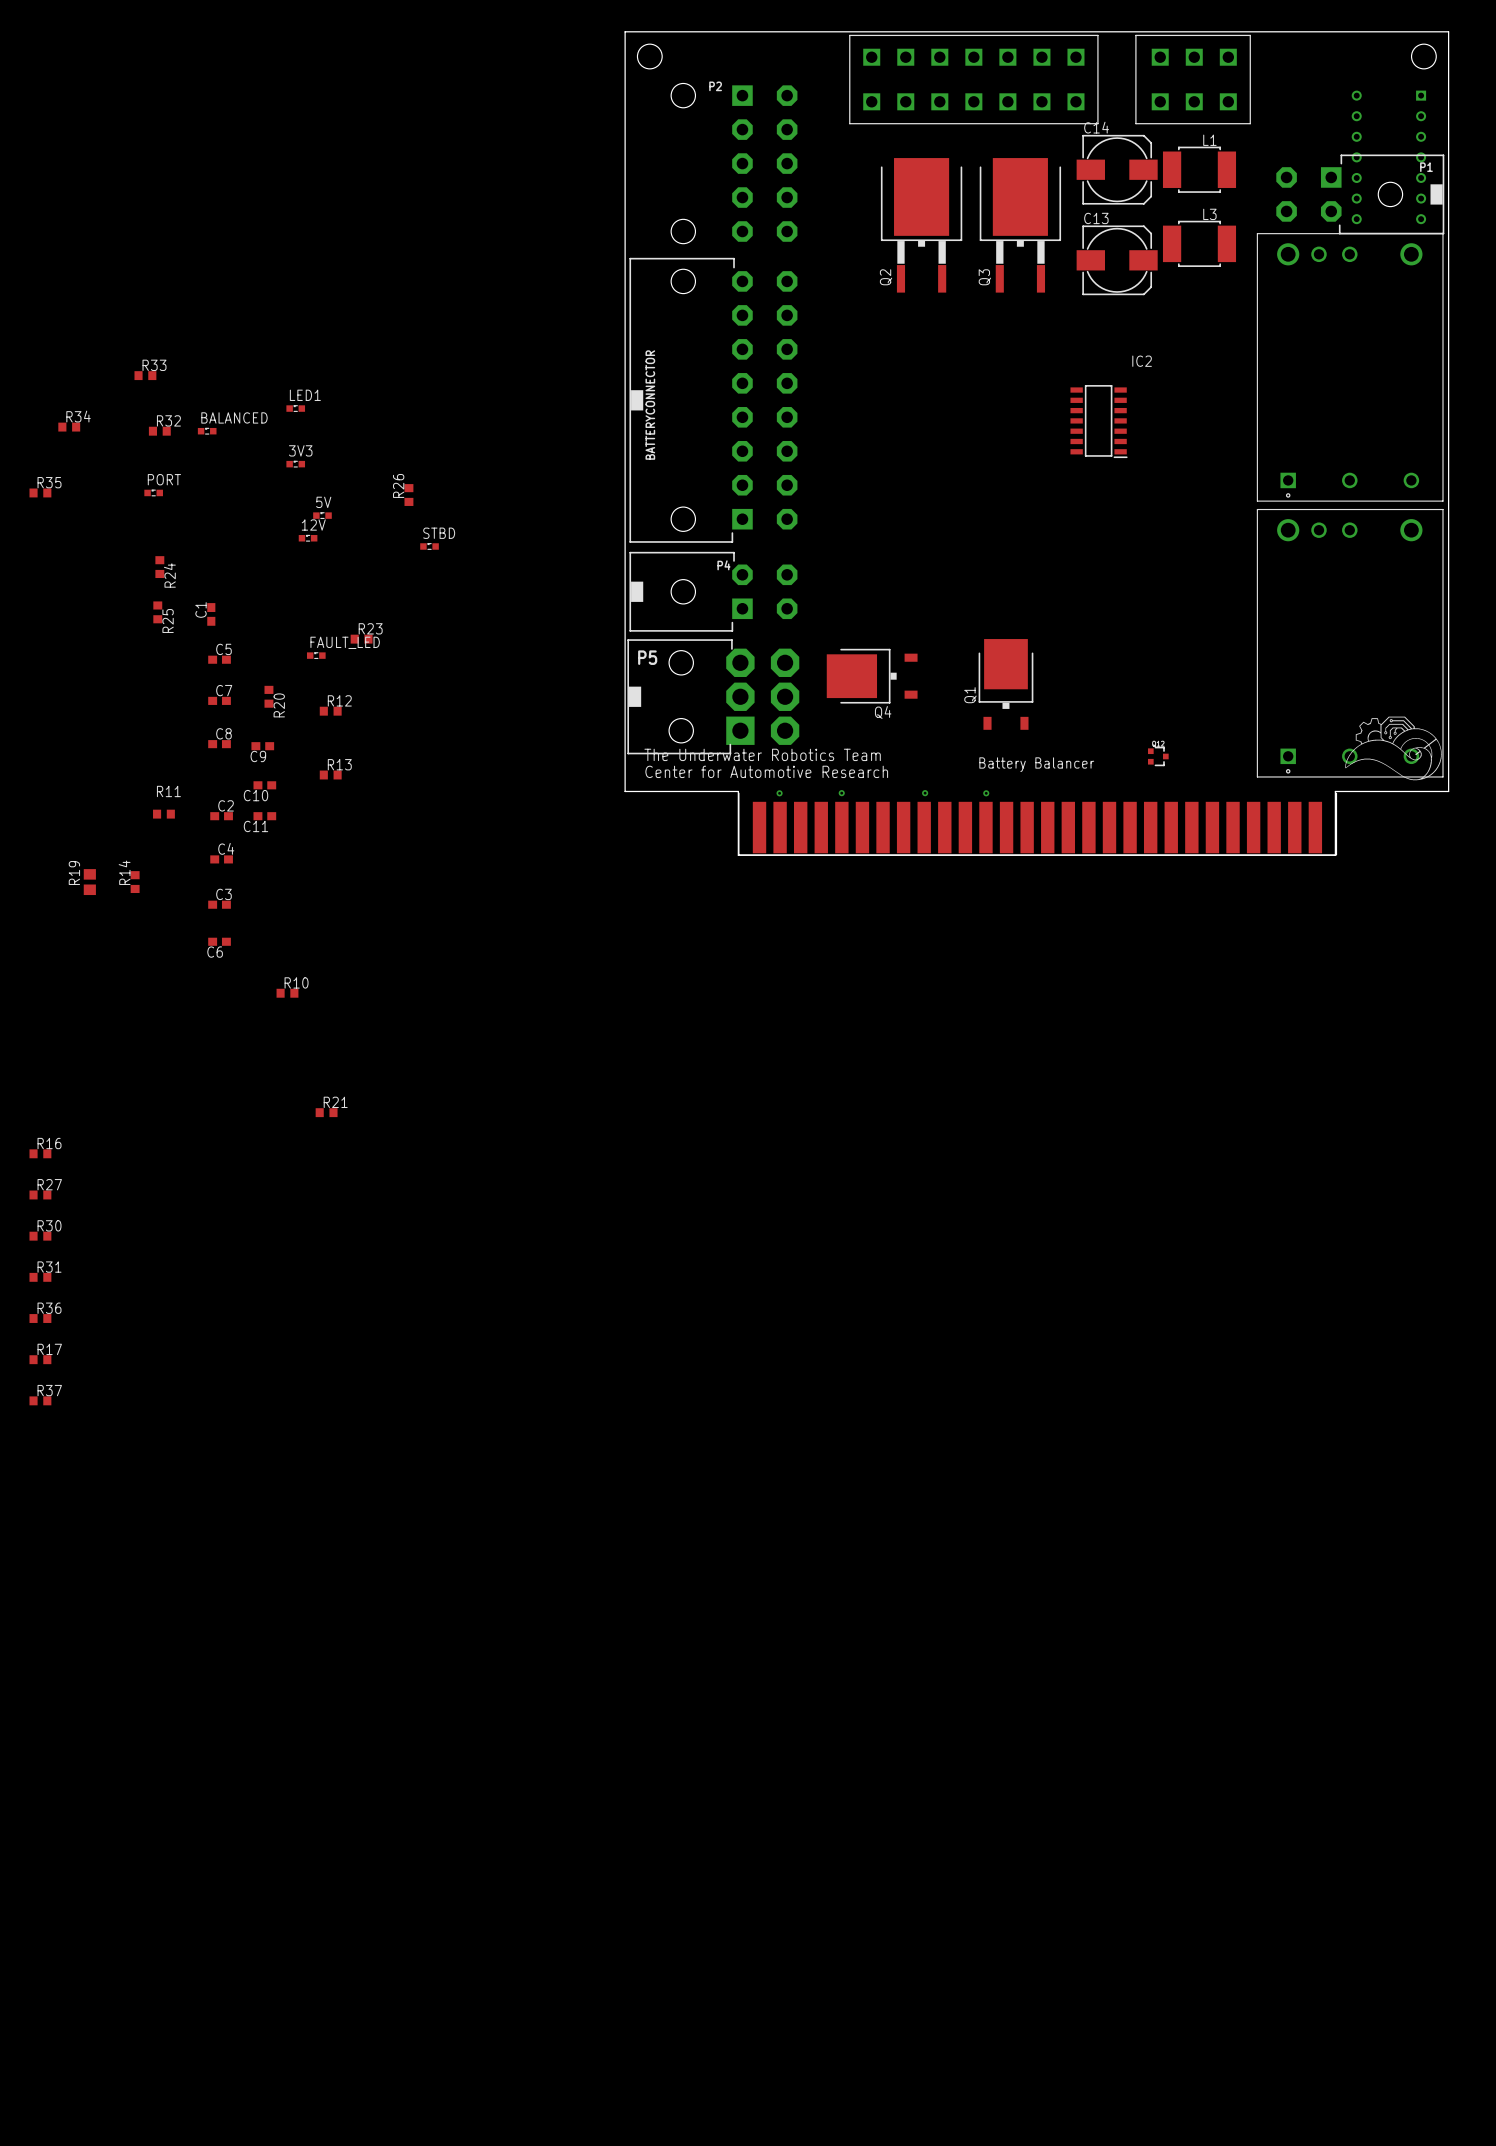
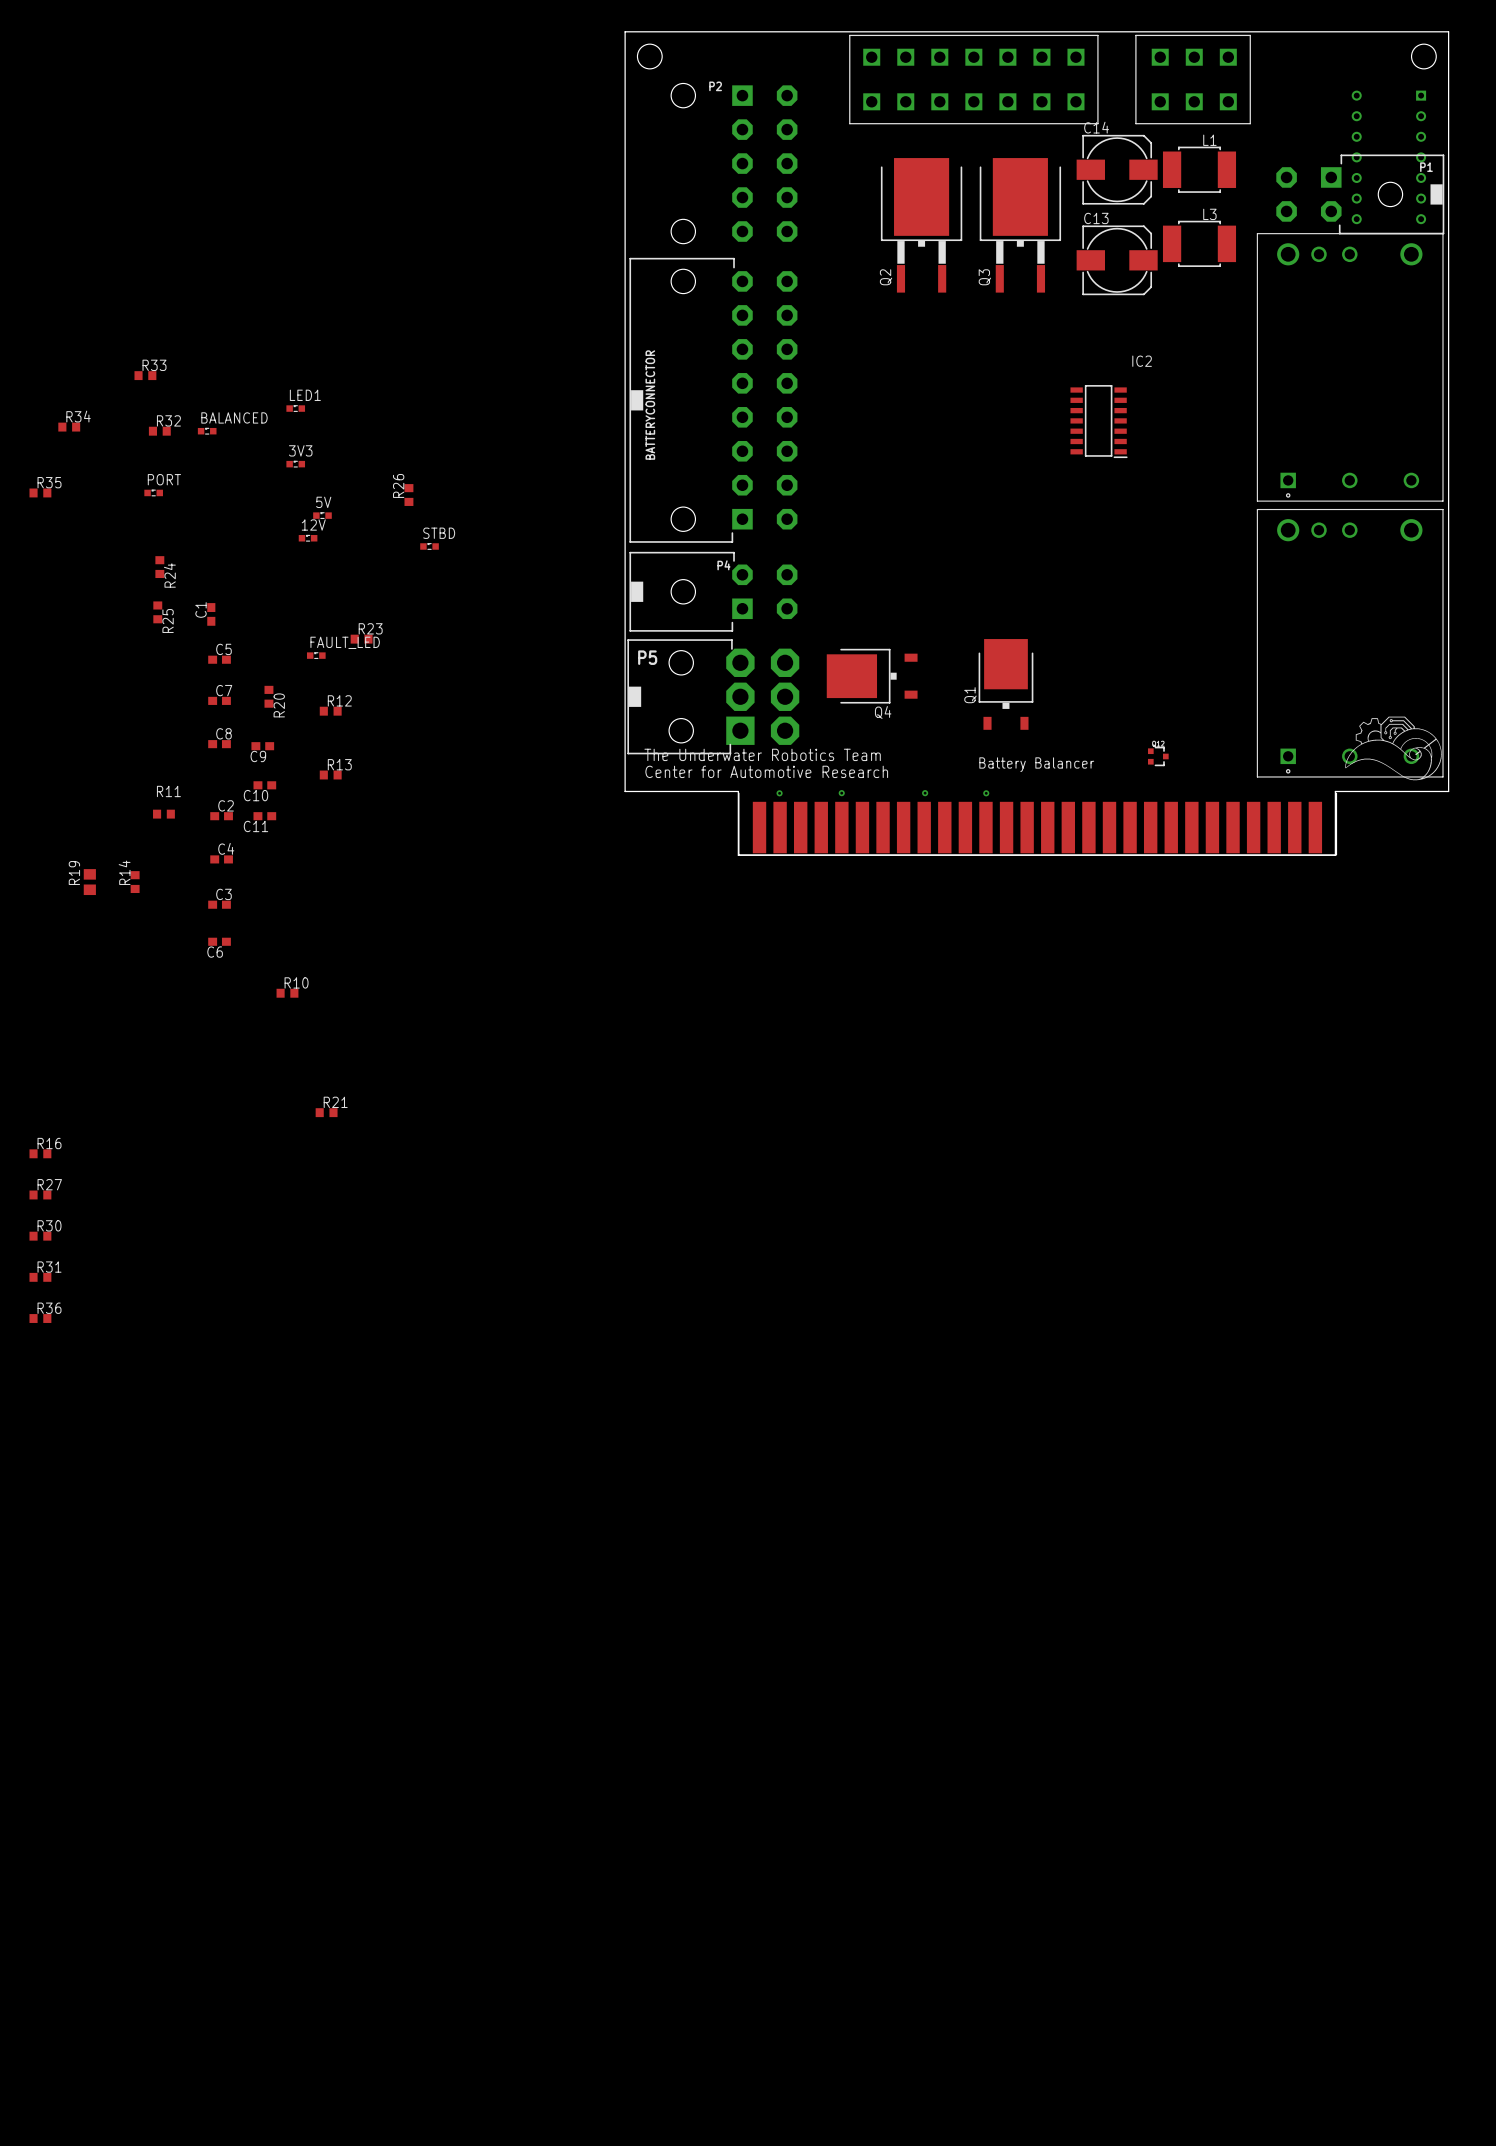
R17: (40, 1359) -> none
R37: (40, 1400) -> none

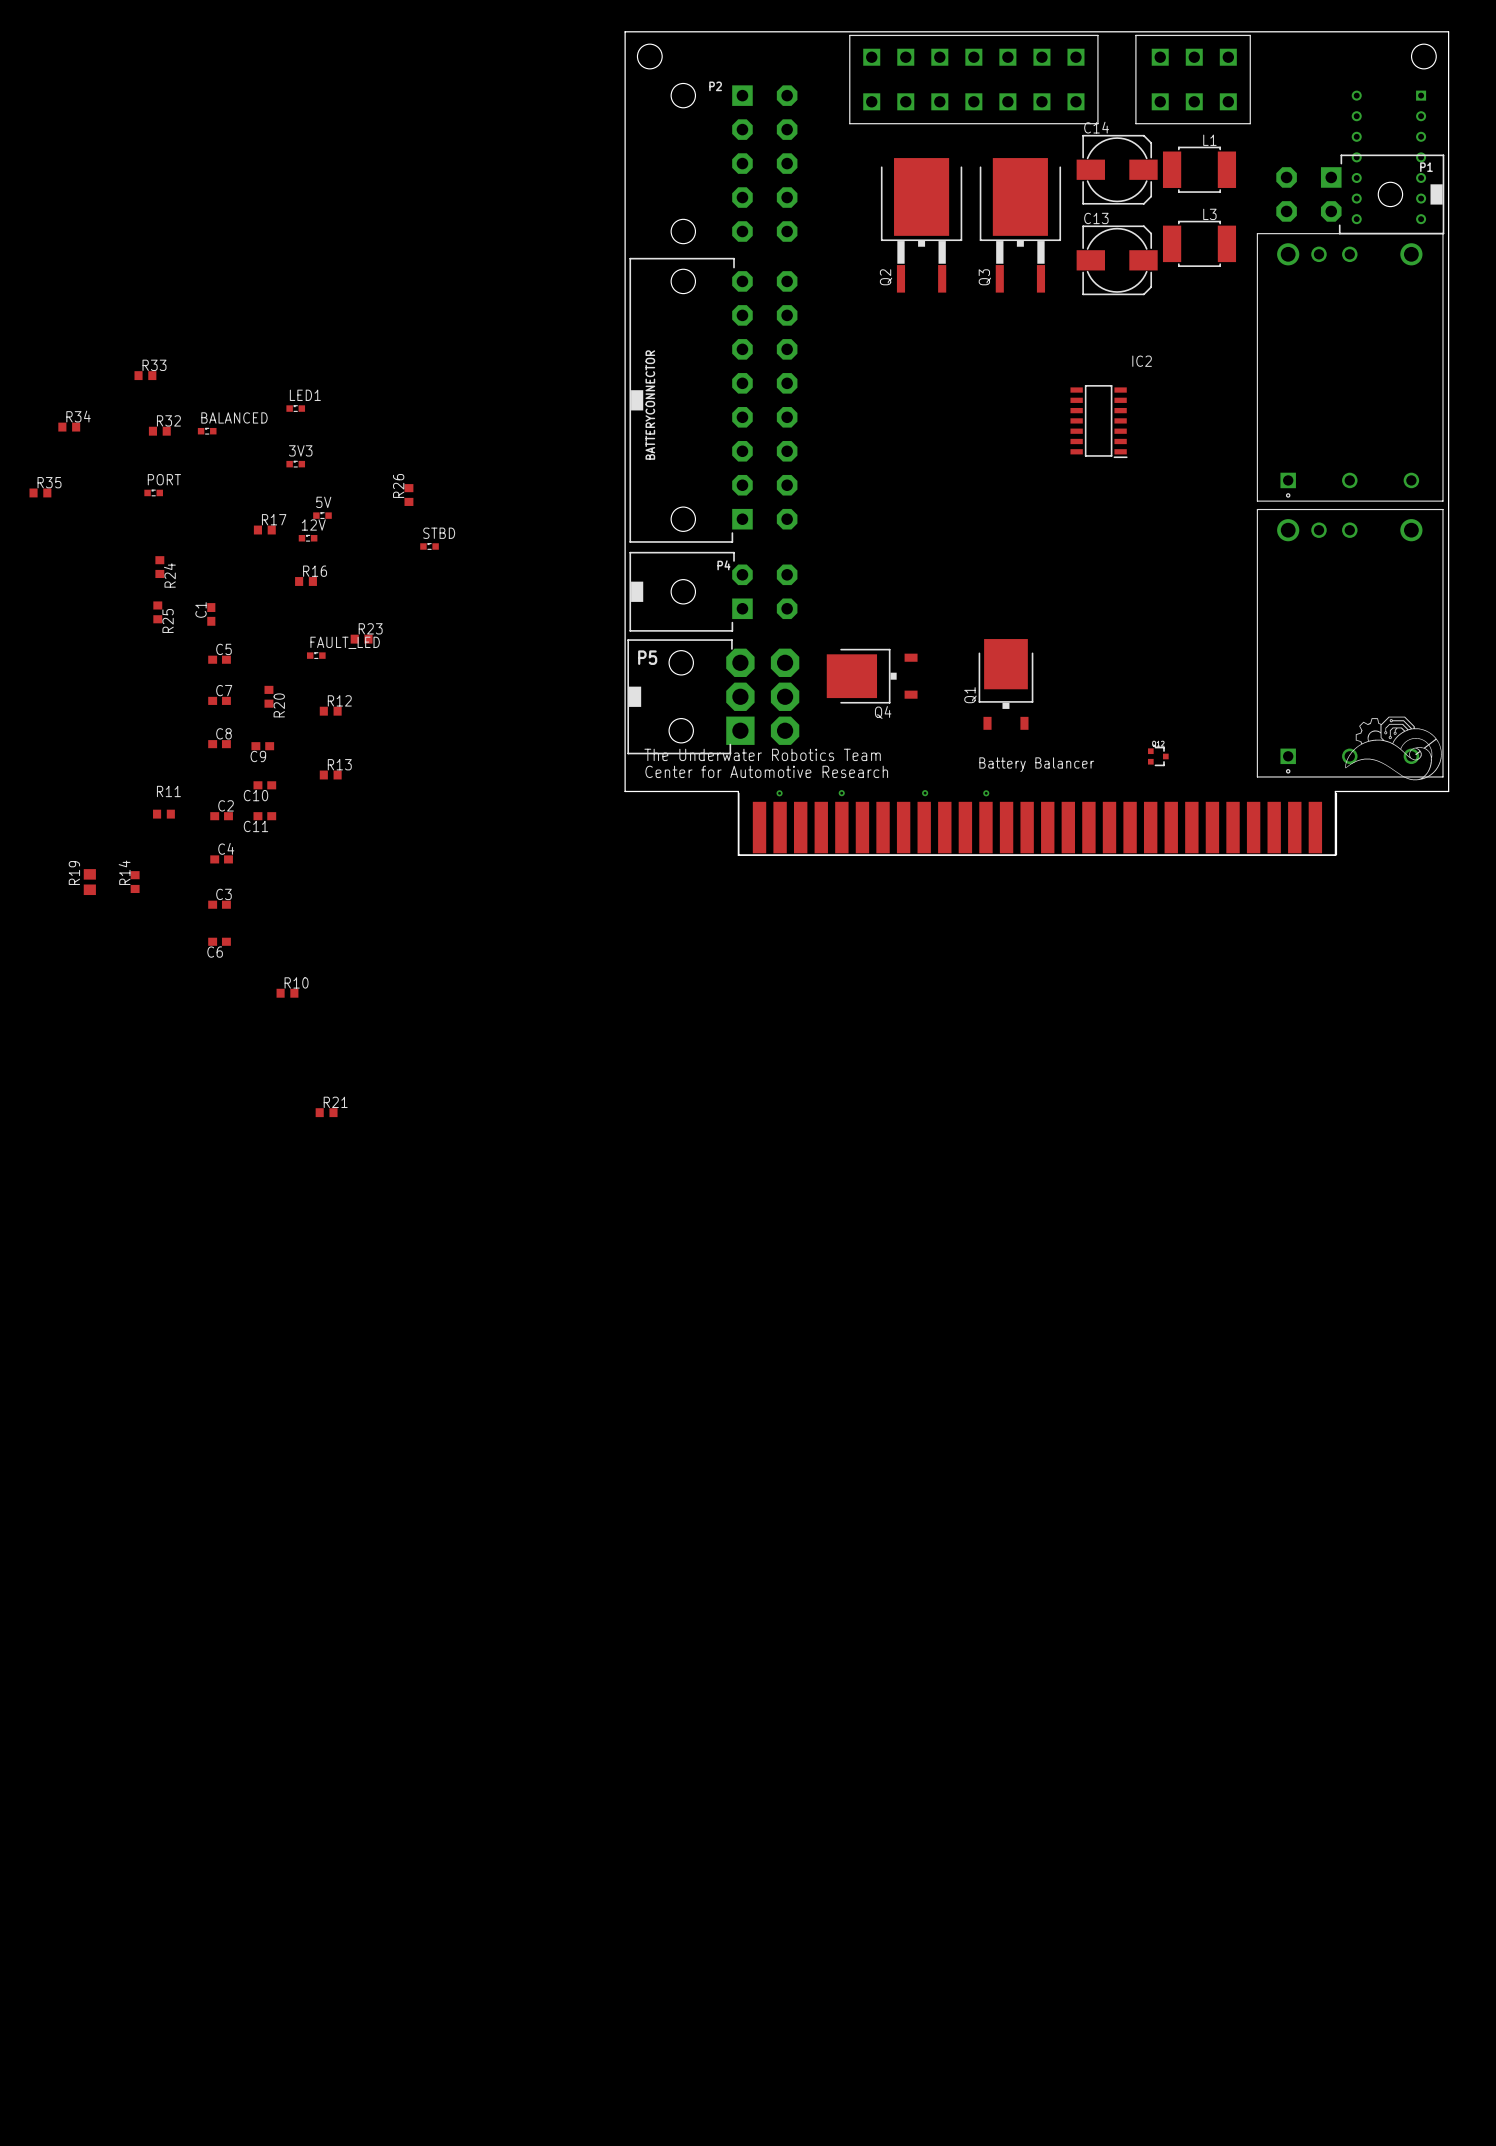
R17: none -> (264, 530)
R16 position: (40, 1153) -> (306, 581)
R27: (40, 1194) -> none
R30: (40, 1236) -> none
R31: (40, 1277) -> none
R36: (40, 1318) -> none

